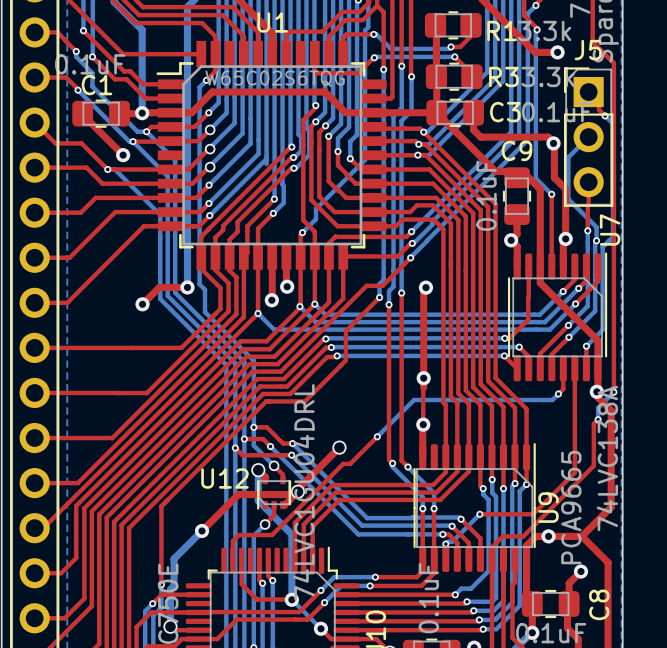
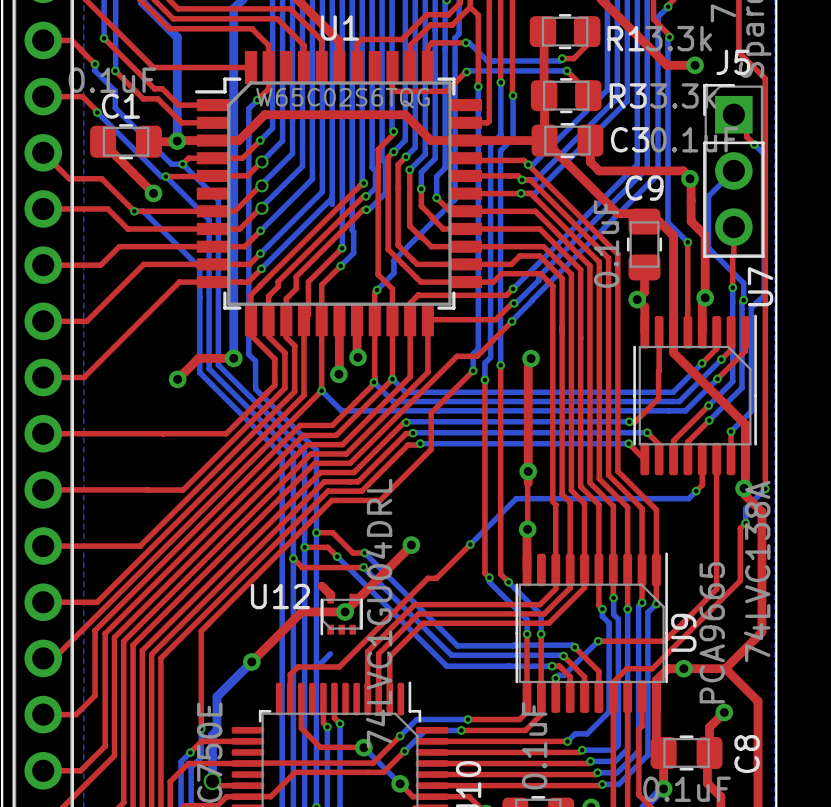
bottom track: (253, 445) (274, 465) -> (316, 555) (316, 667)
top track: (339, 447) (283, 505) -> none
via position: (339, 447) -> (411, 545)
top track: (274, 465) (282, 474) (282, 480) -> none
via: (274, 465) -> none
bottom track: (258, 470) (258, 500) (291, 534) (291, 599) -> none
via: (258, 470) -> none
via: none -> (345, 611)
via: (297, 491) -> none
top track: (238, 494) (295, 494) -> (297, 616) (301, 611) (345, 611) (411, 545)
top track: (274, 505) (274, 515) (265, 524) -> none
via: (265, 524) -> none

